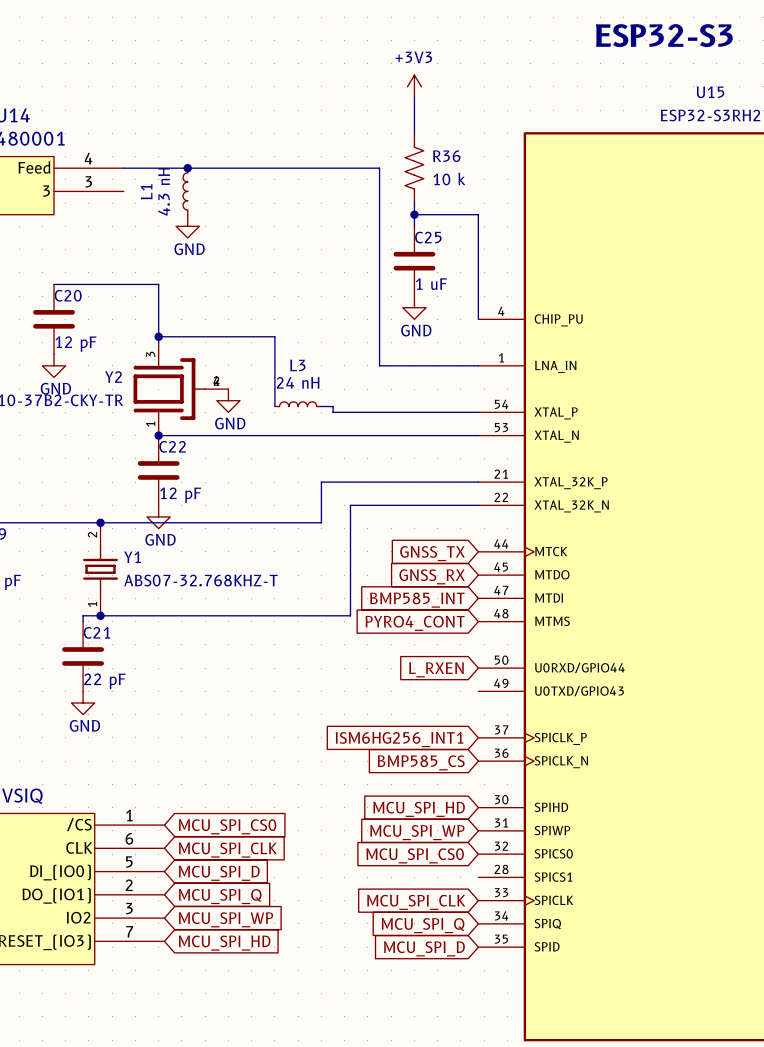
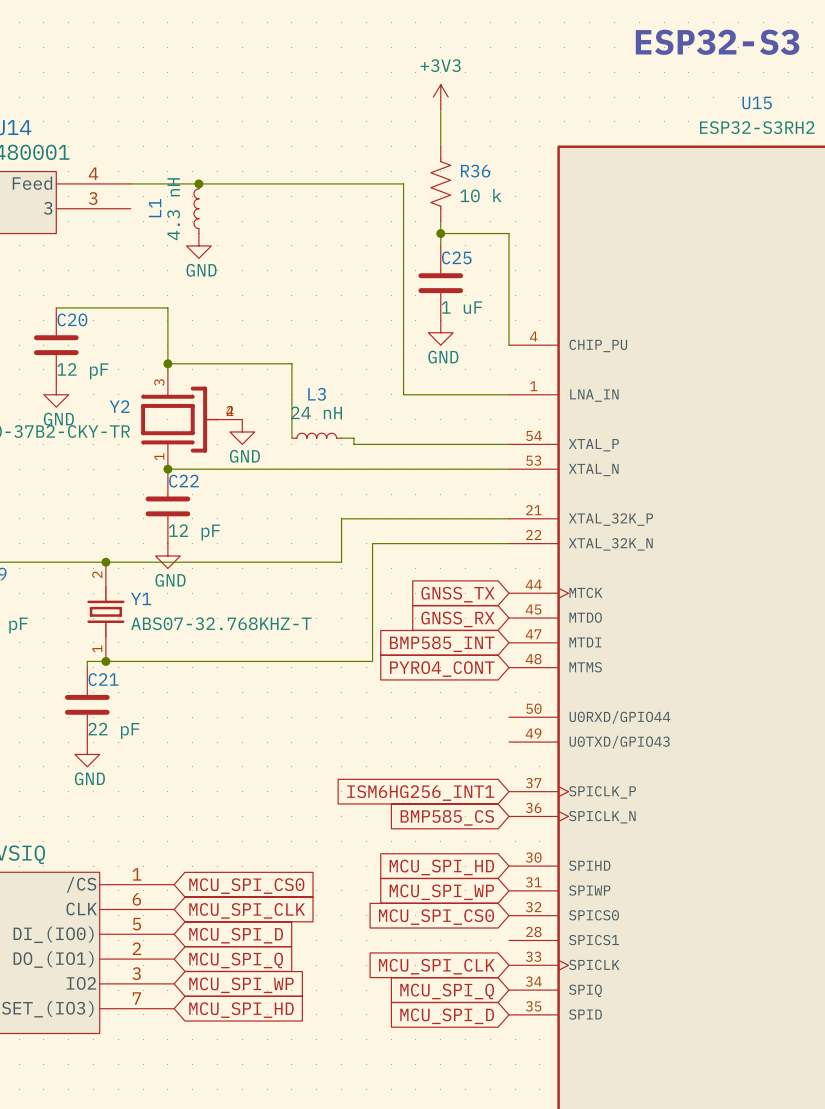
global label: L_RXEN (436, 669) -> none

